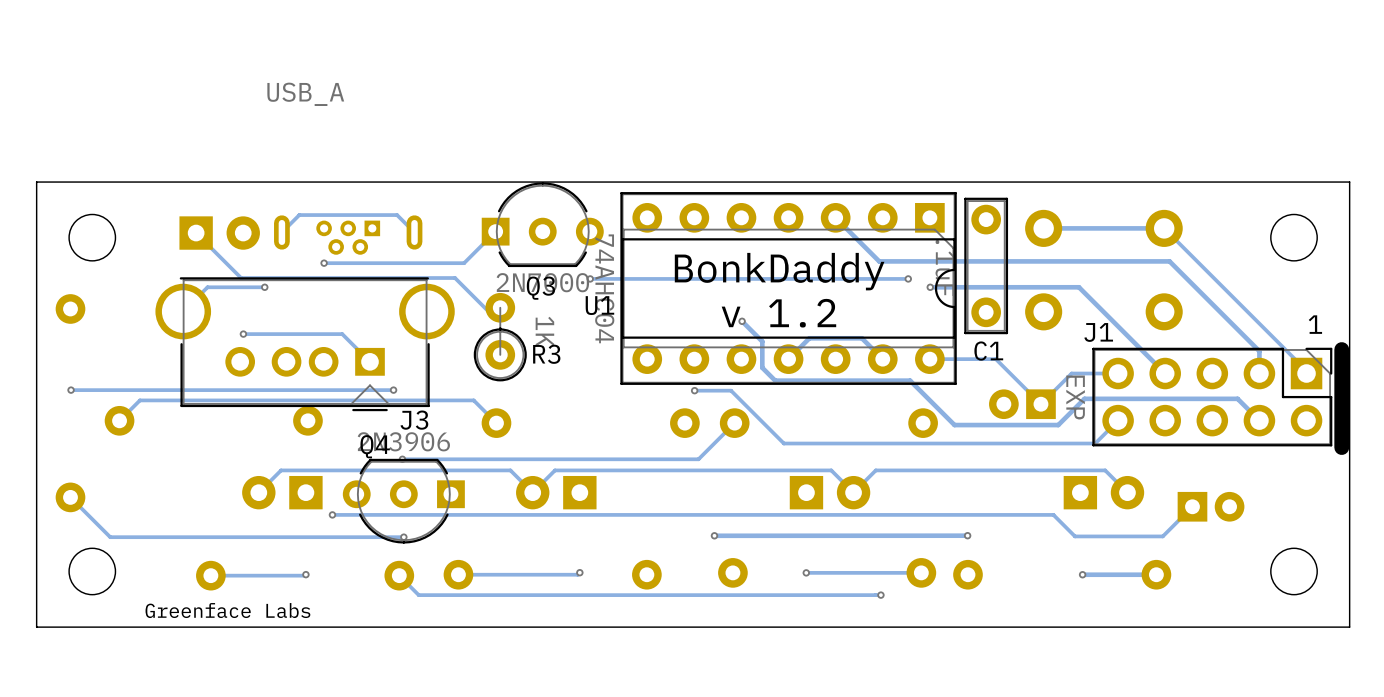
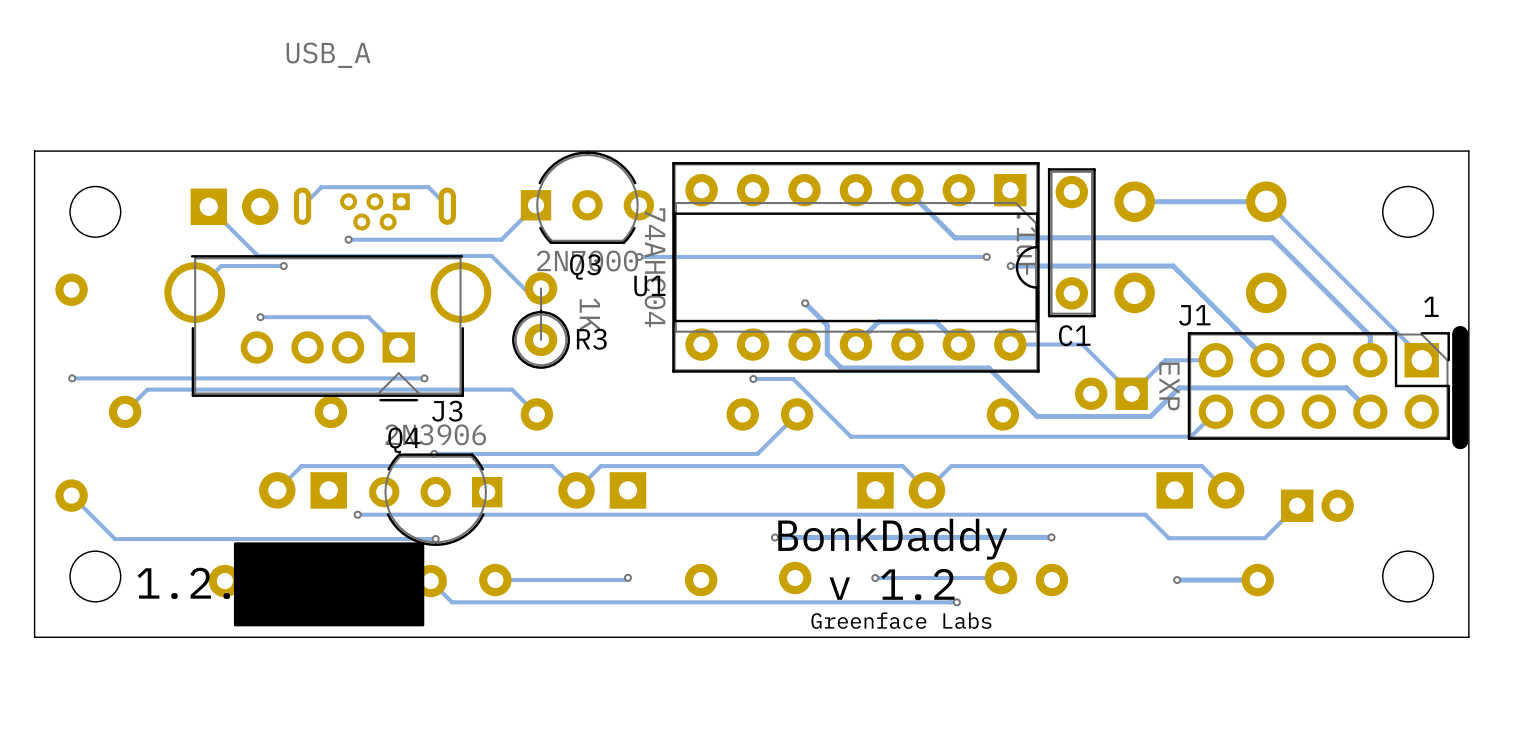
text position: BonkDaddy (779, 271) -> BonkDaddy (892, 539)
text position: v 1.2 (778, 313) -> v 1.2 (892, 584)
drawing: none -> [233, 542, 425, 627]
text: none -> 1.2. (183, 583)
text: Greenface Labs (227, 610) -> none
text: none -> Greenface Labs (901, 620)

